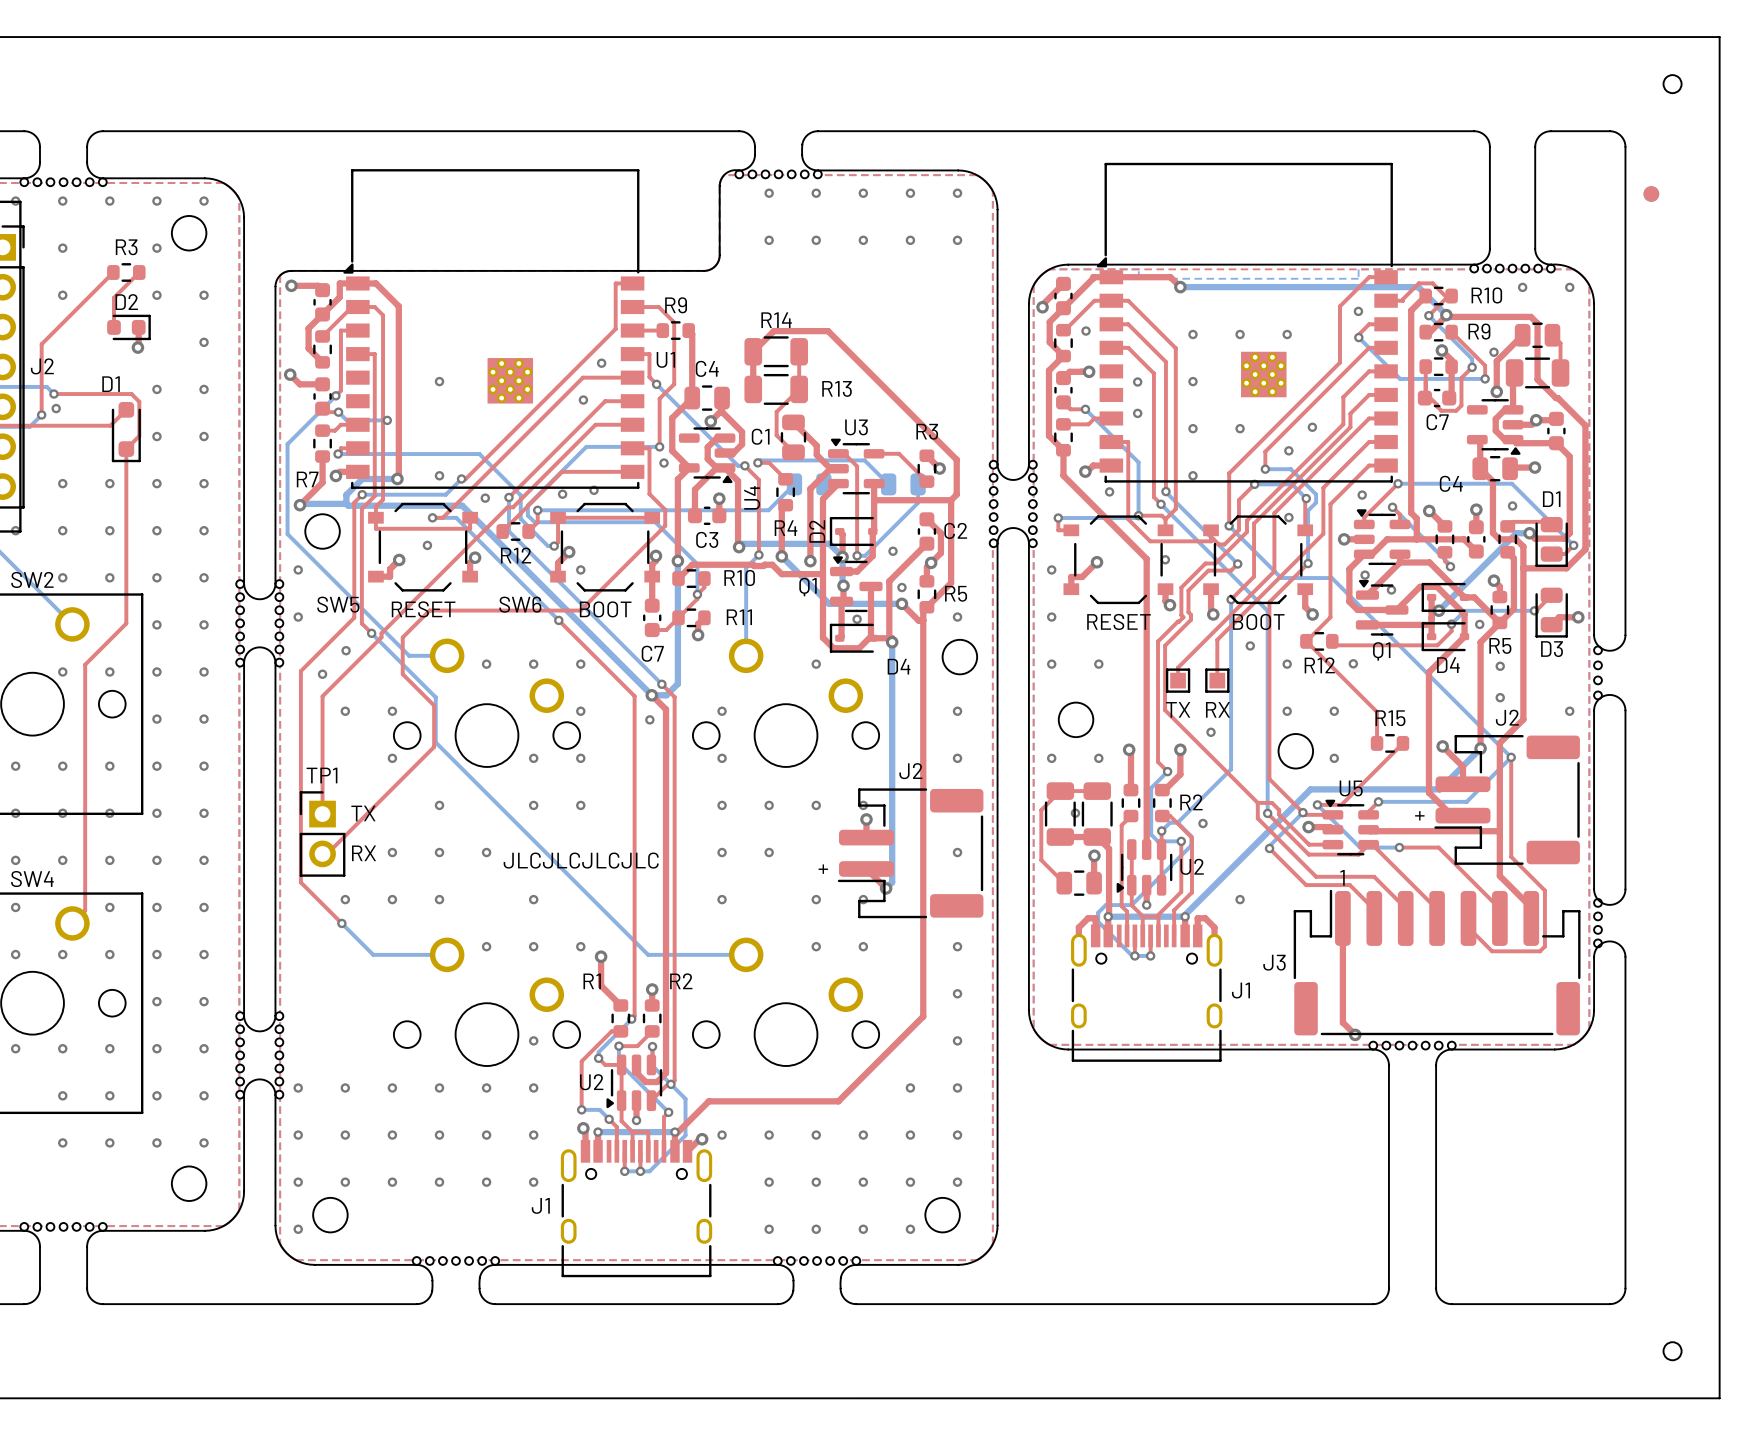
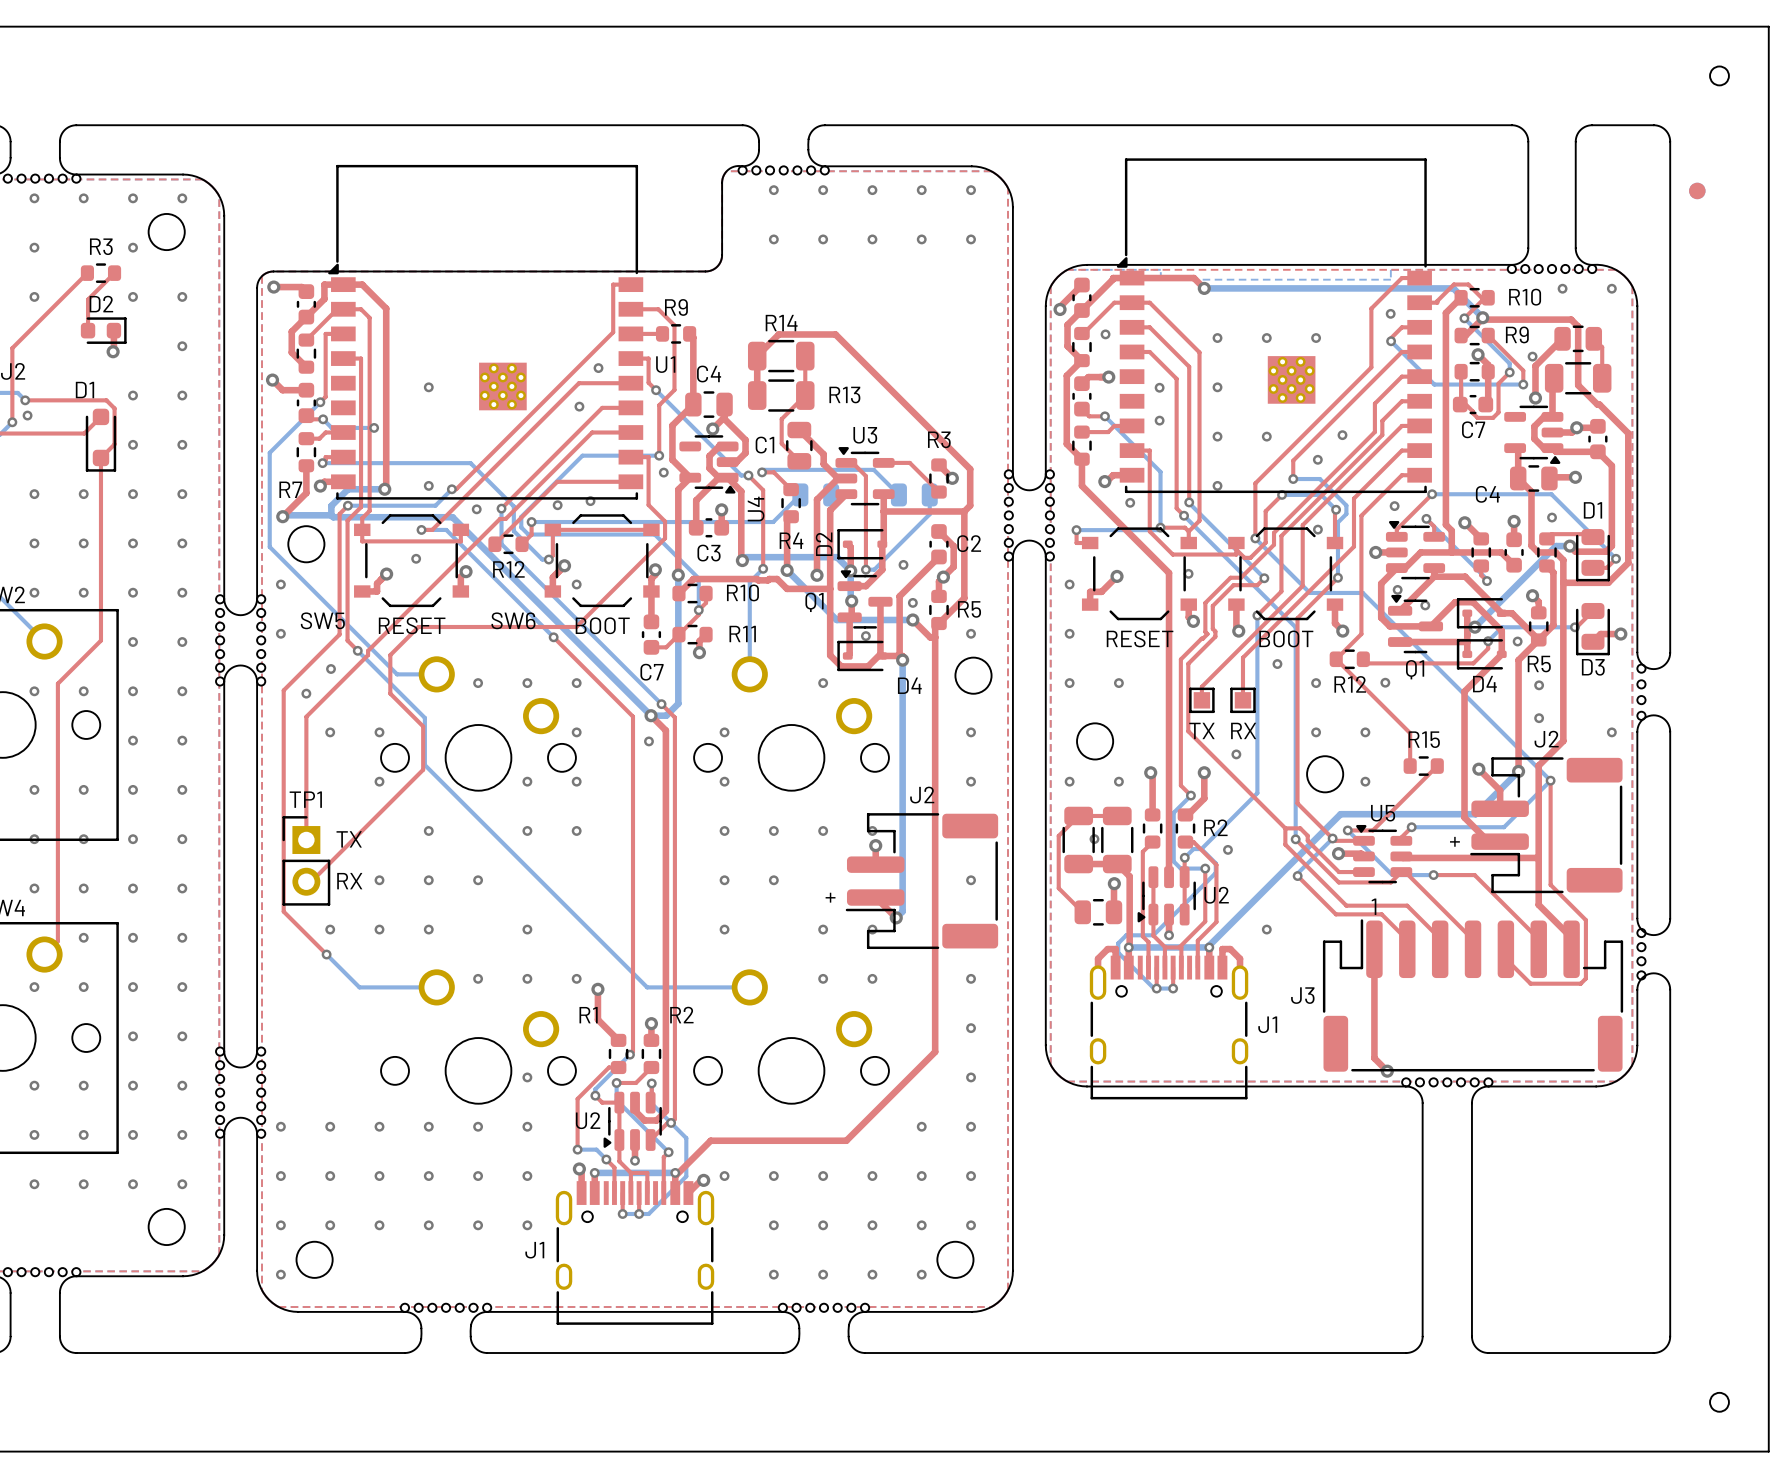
text: JLCJLCJLCJLC (581, 860) -> none

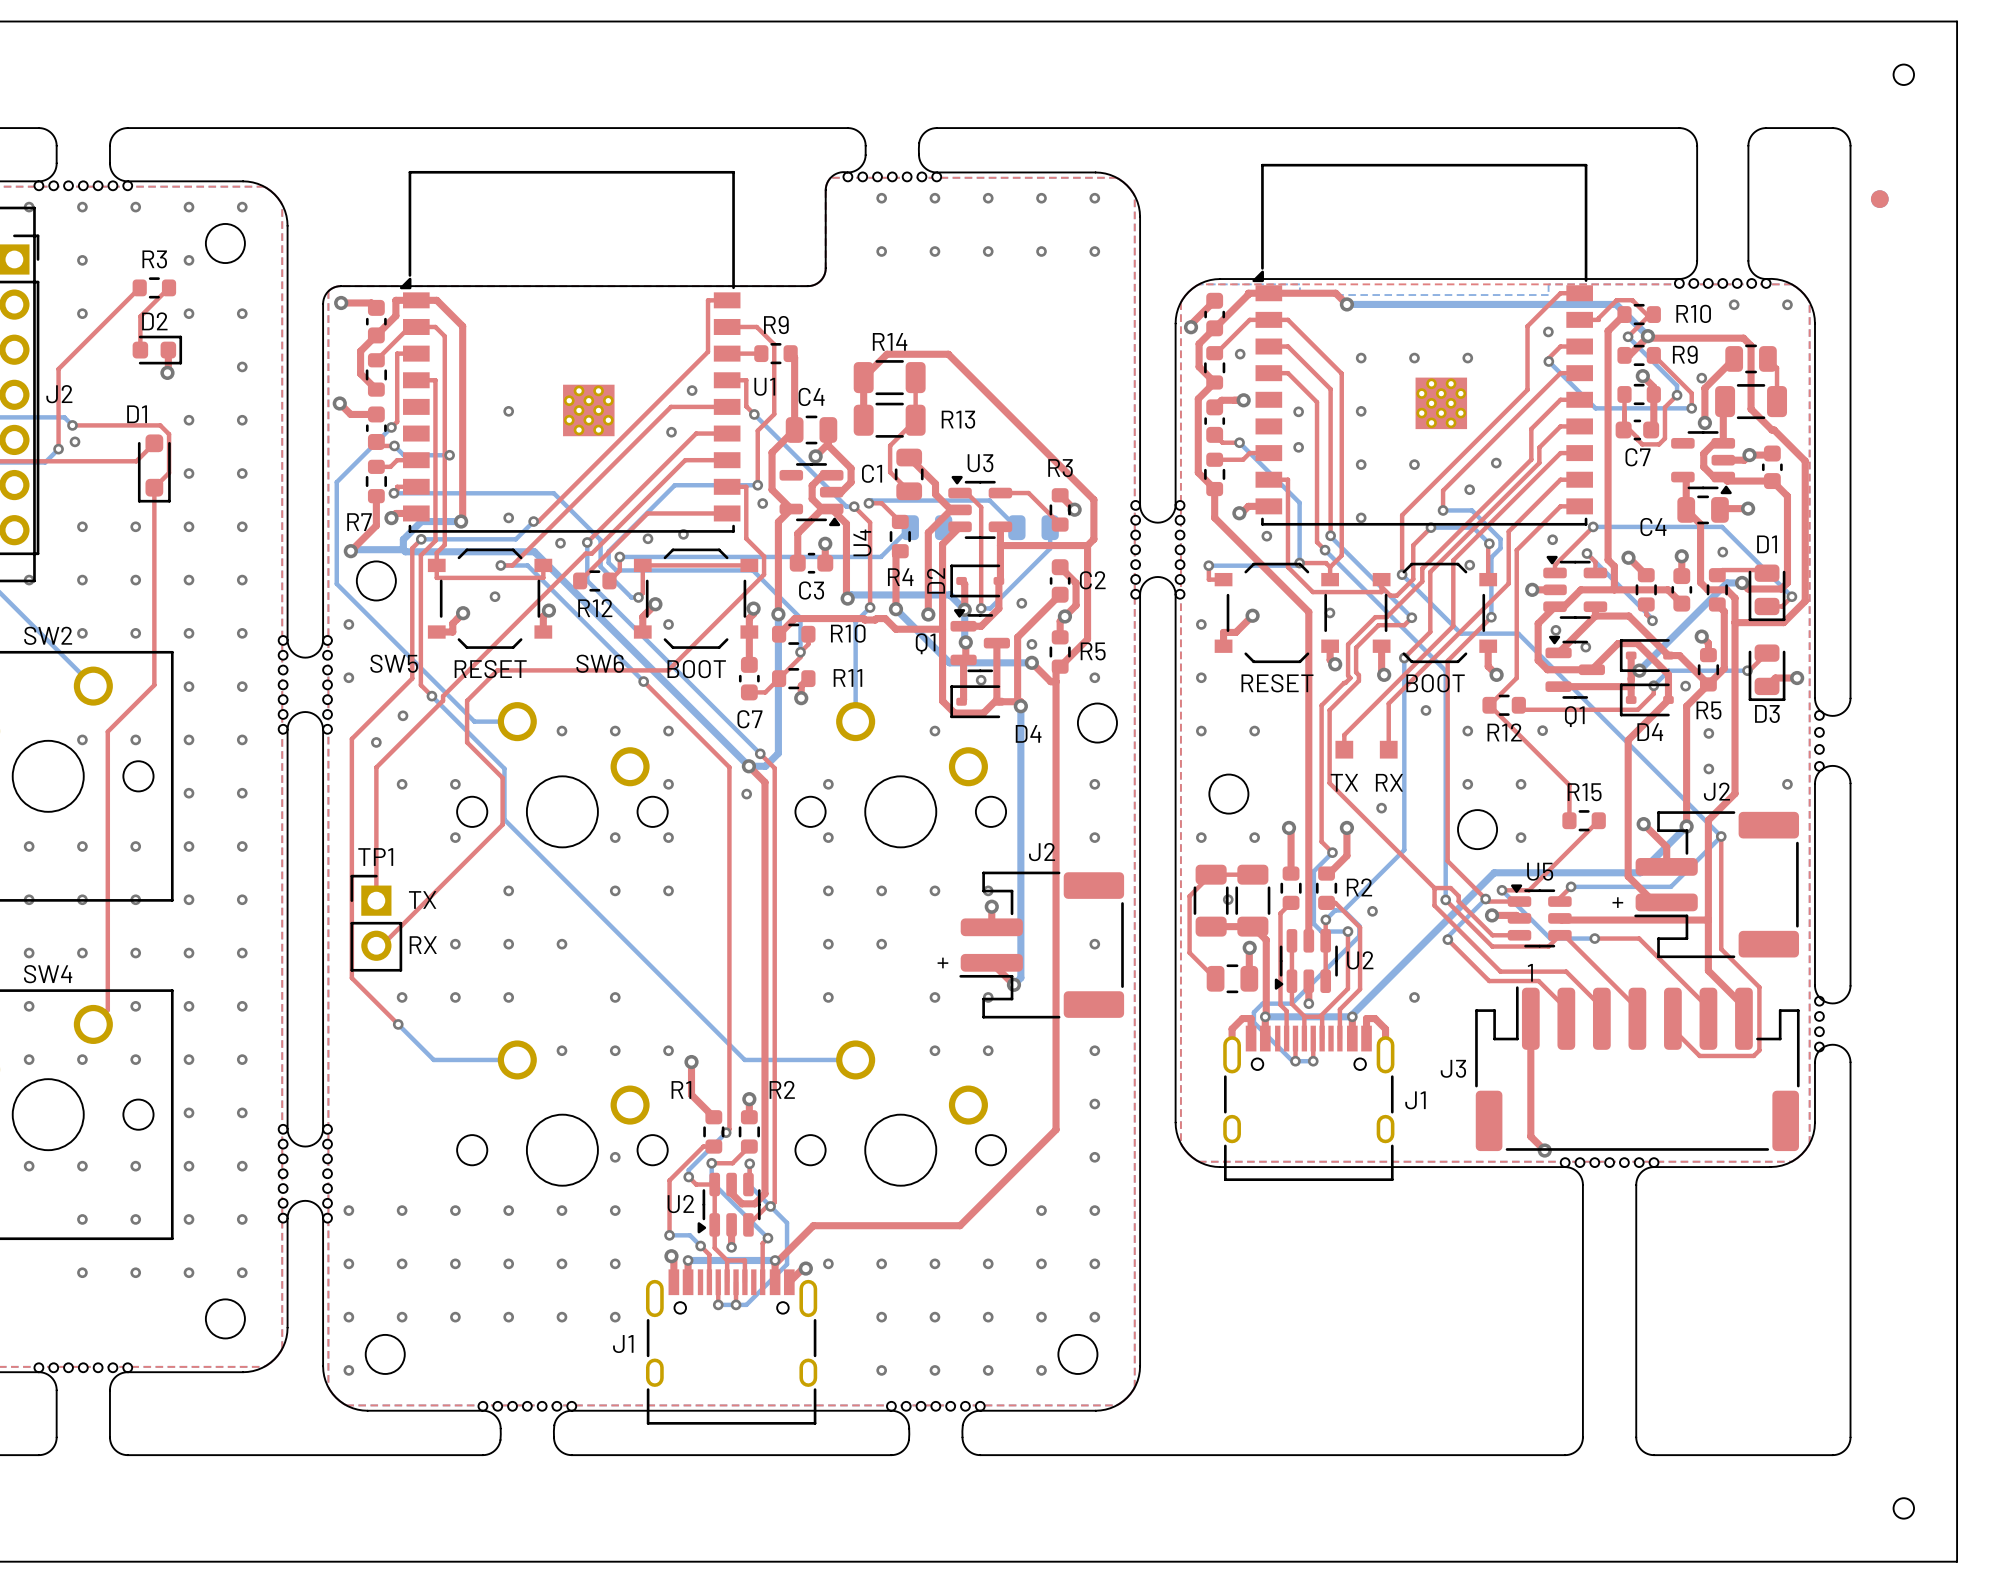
part footprint: [1189, 687, 1215, 714] -> [1335, 740, 1354, 759]
part footprint: [1230, 687, 1256, 714] -> [1379, 740, 1398, 759]

